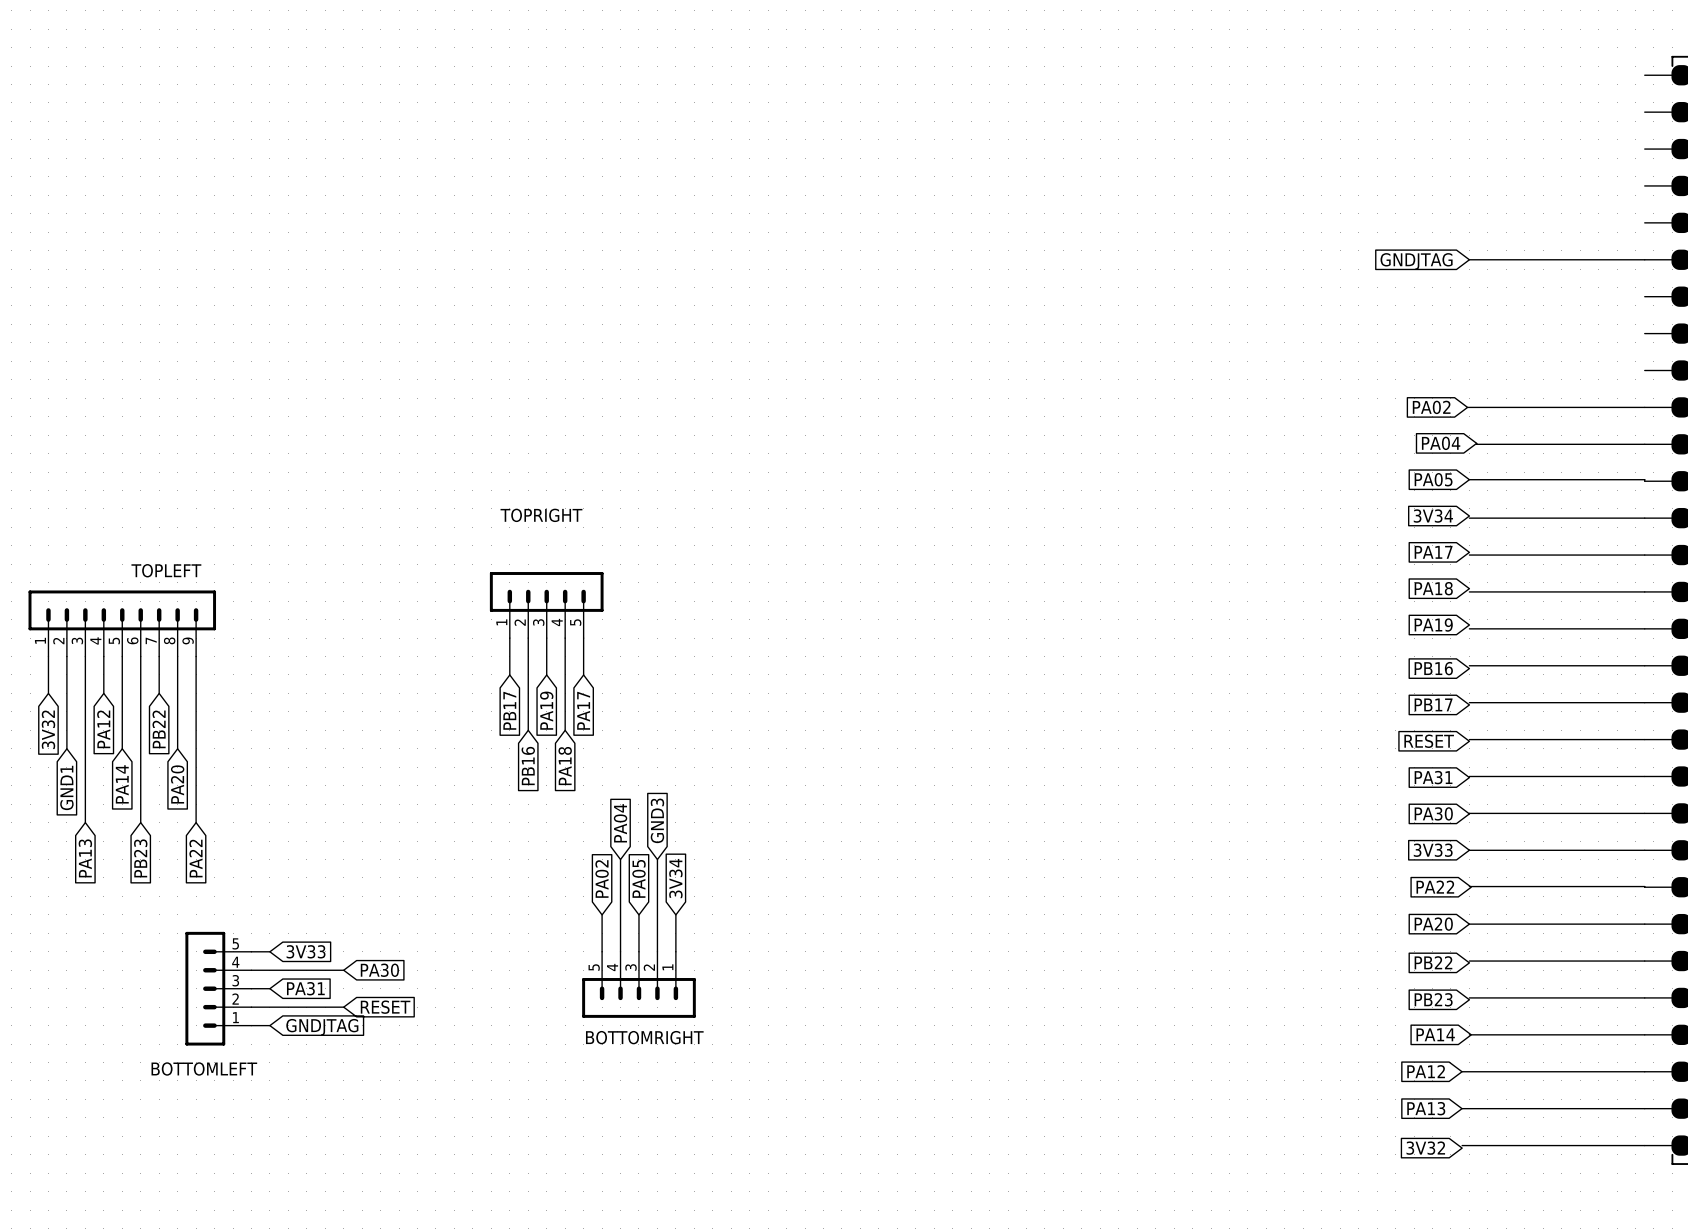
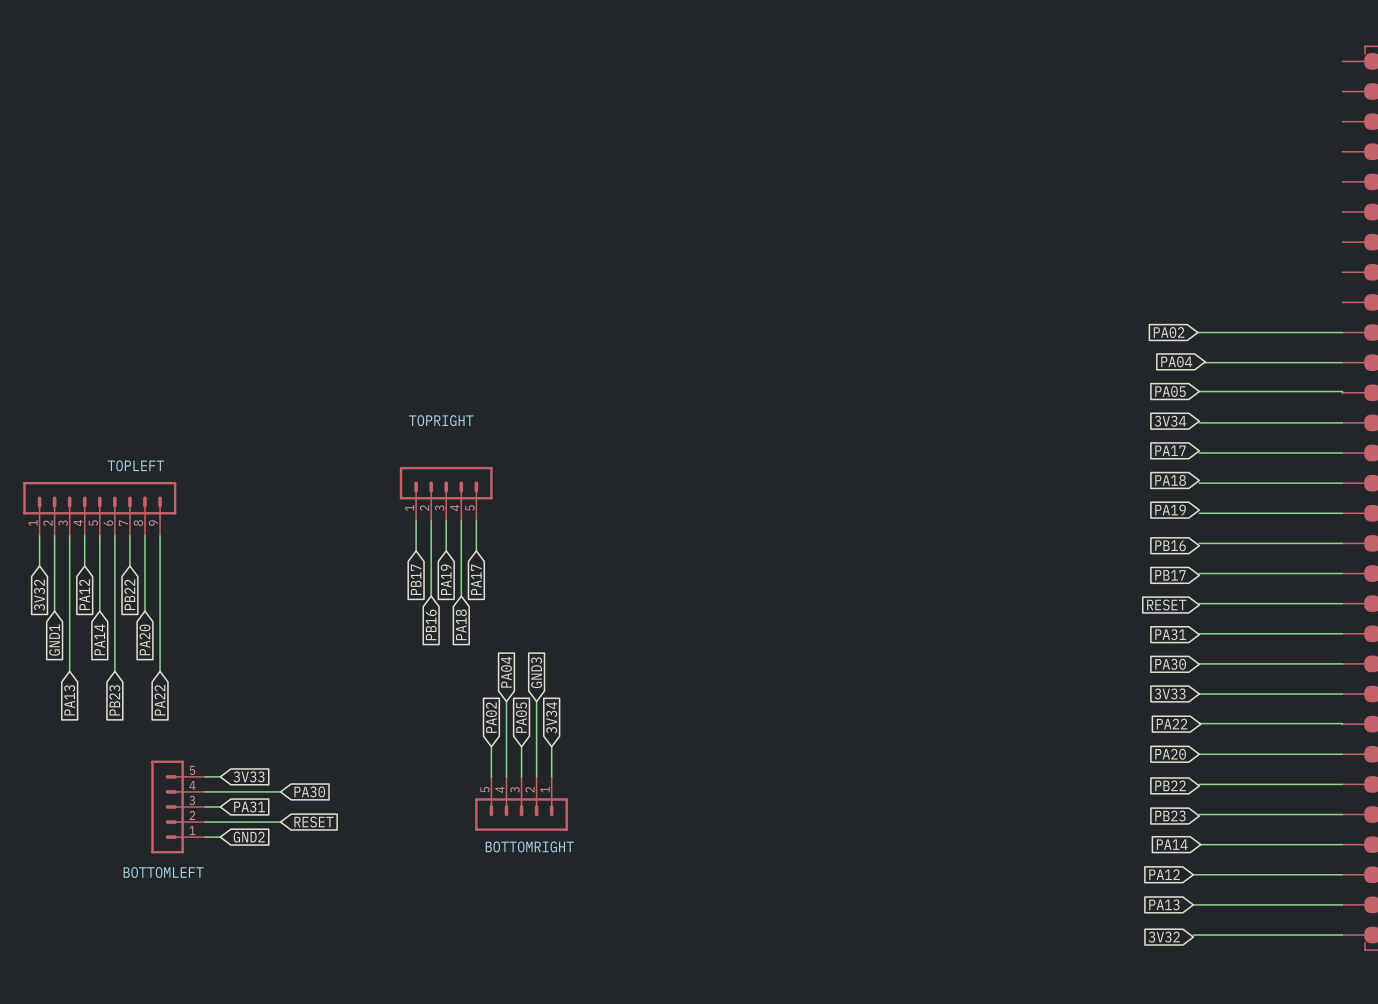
wire: (1469, 259) (1644, 259) -> none
global label: GNDJTAG (1416, 261) -> none
global label: GNDJTAG (322, 1027) -> GND2 (249, 837)

